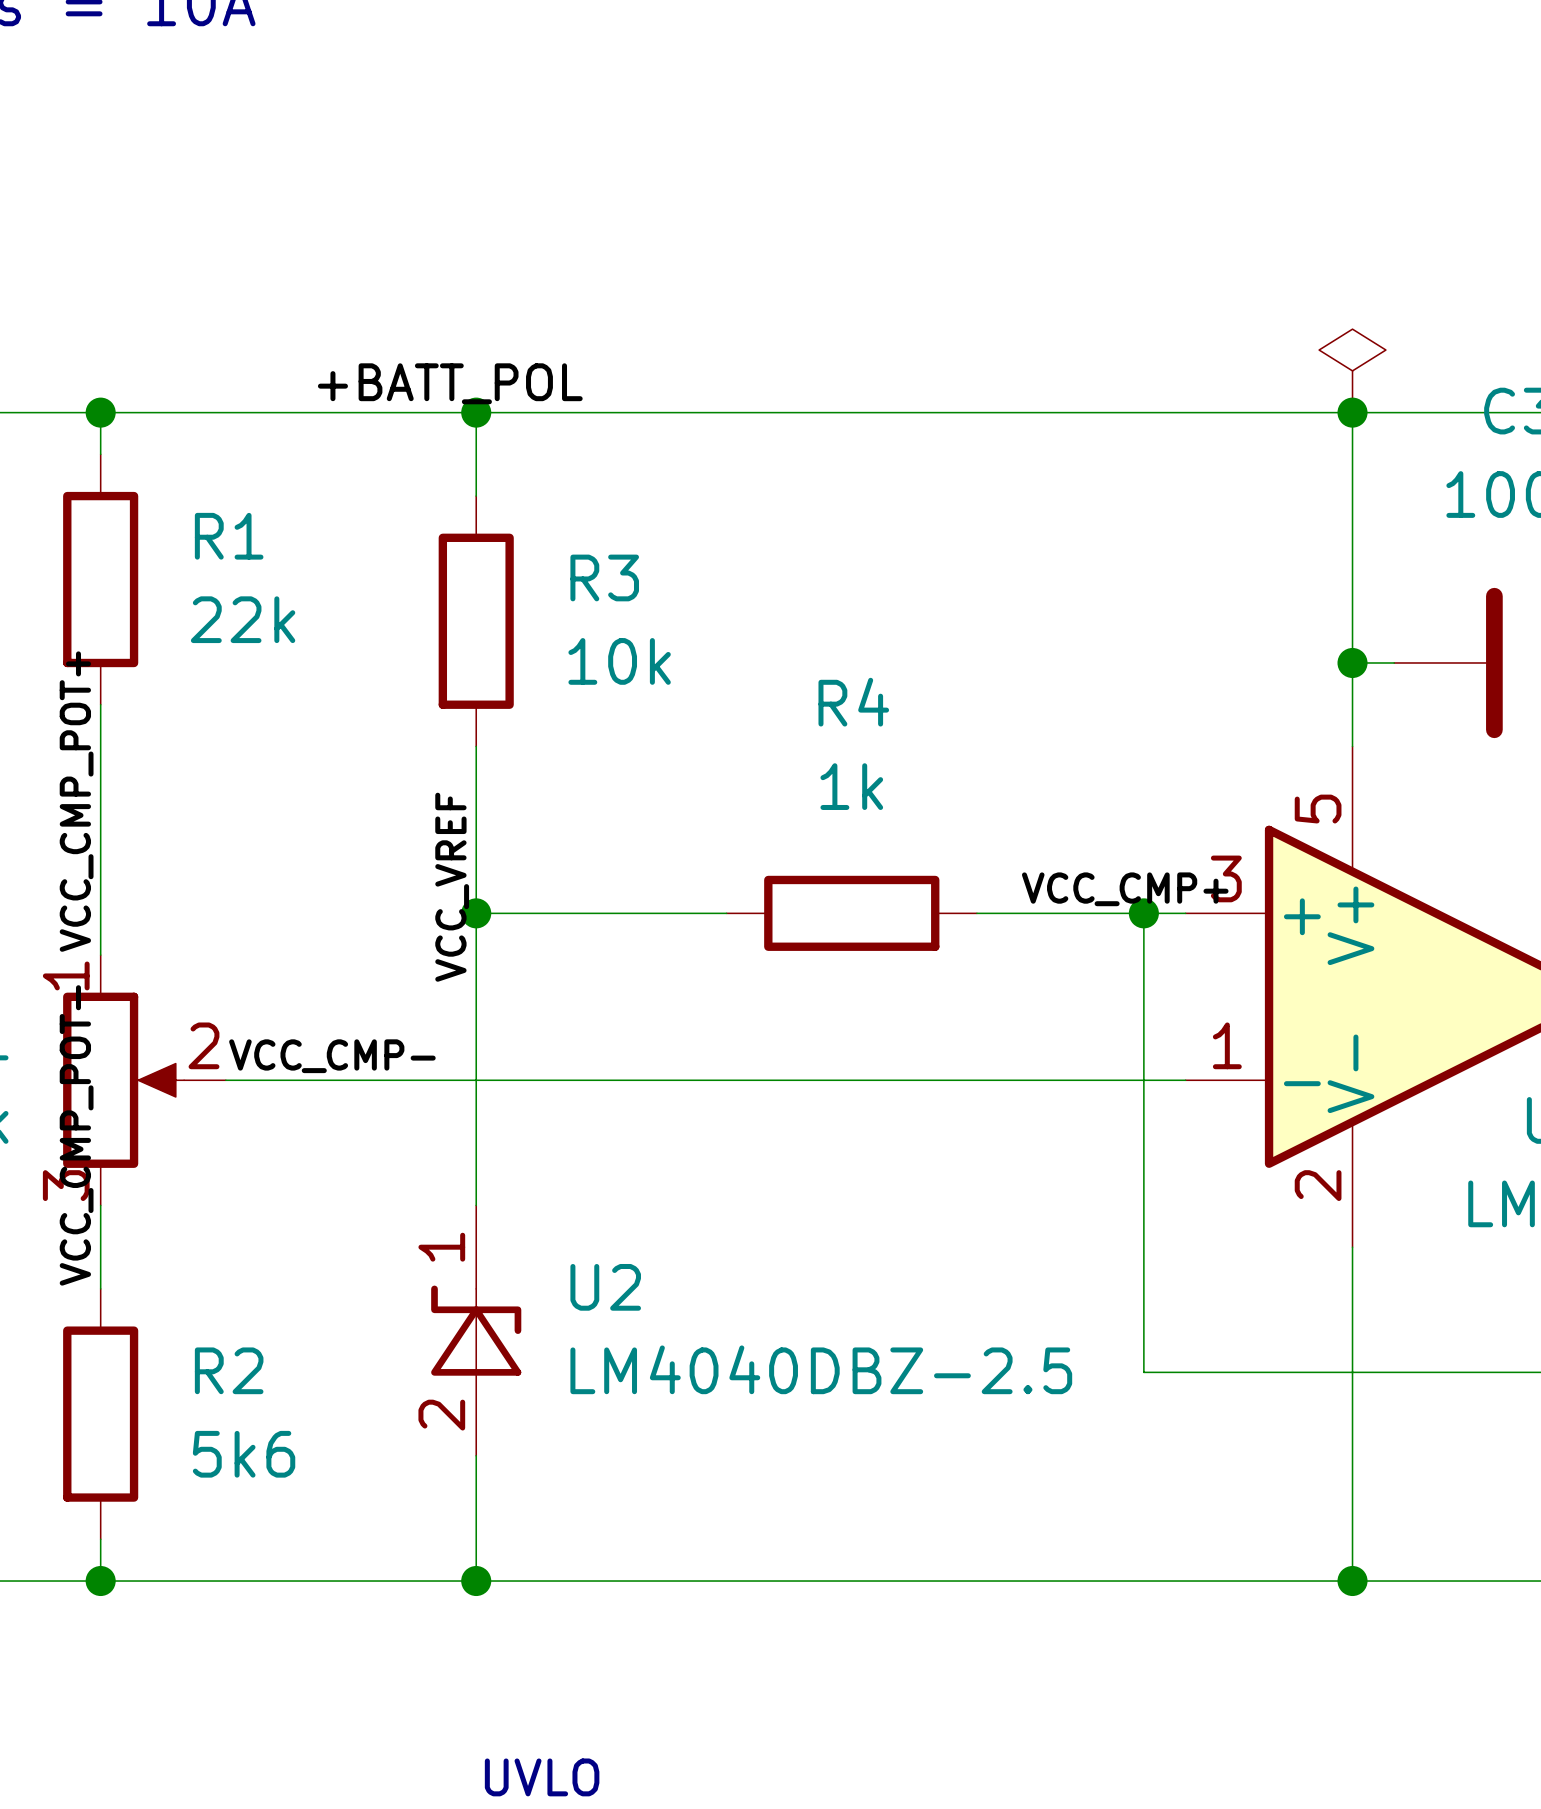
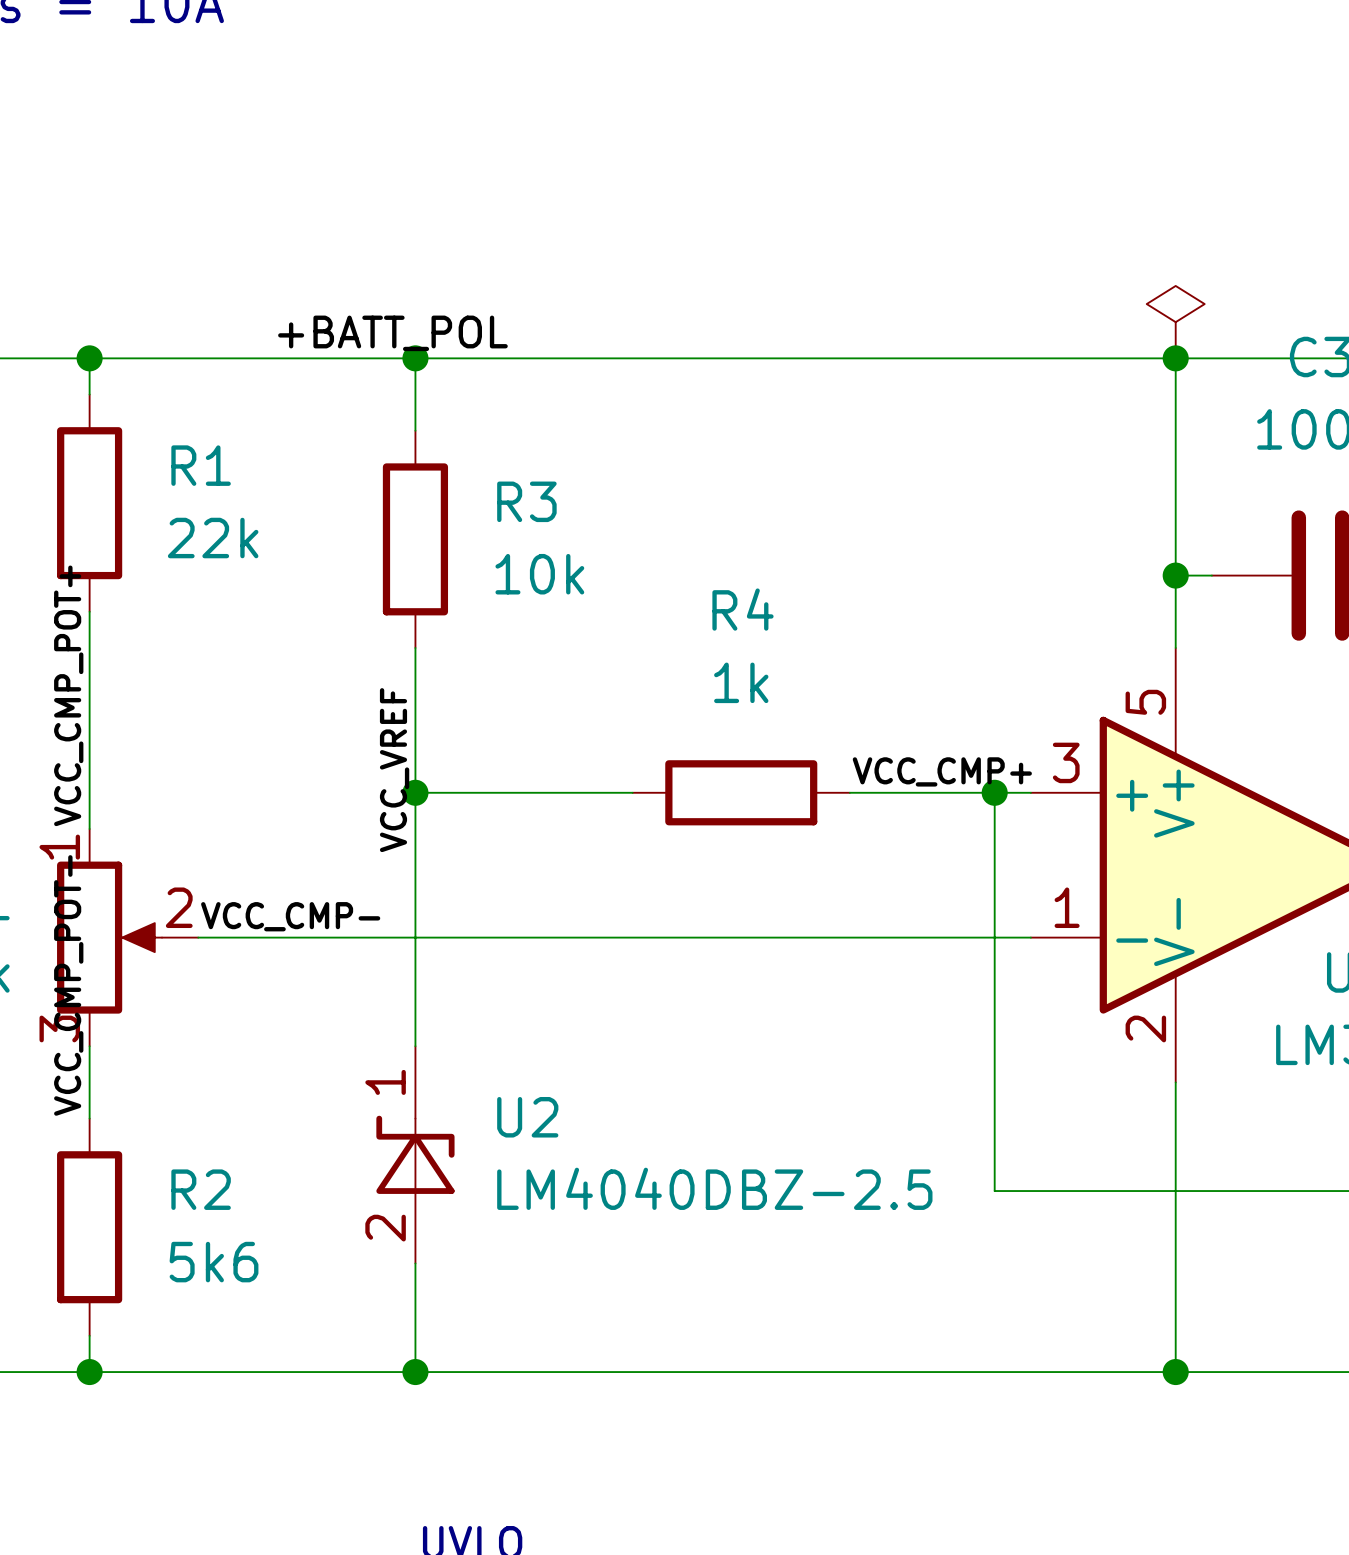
label position: VCC_CMP+ (1125, 889) -> VCC_CMP+ (942, 771)

